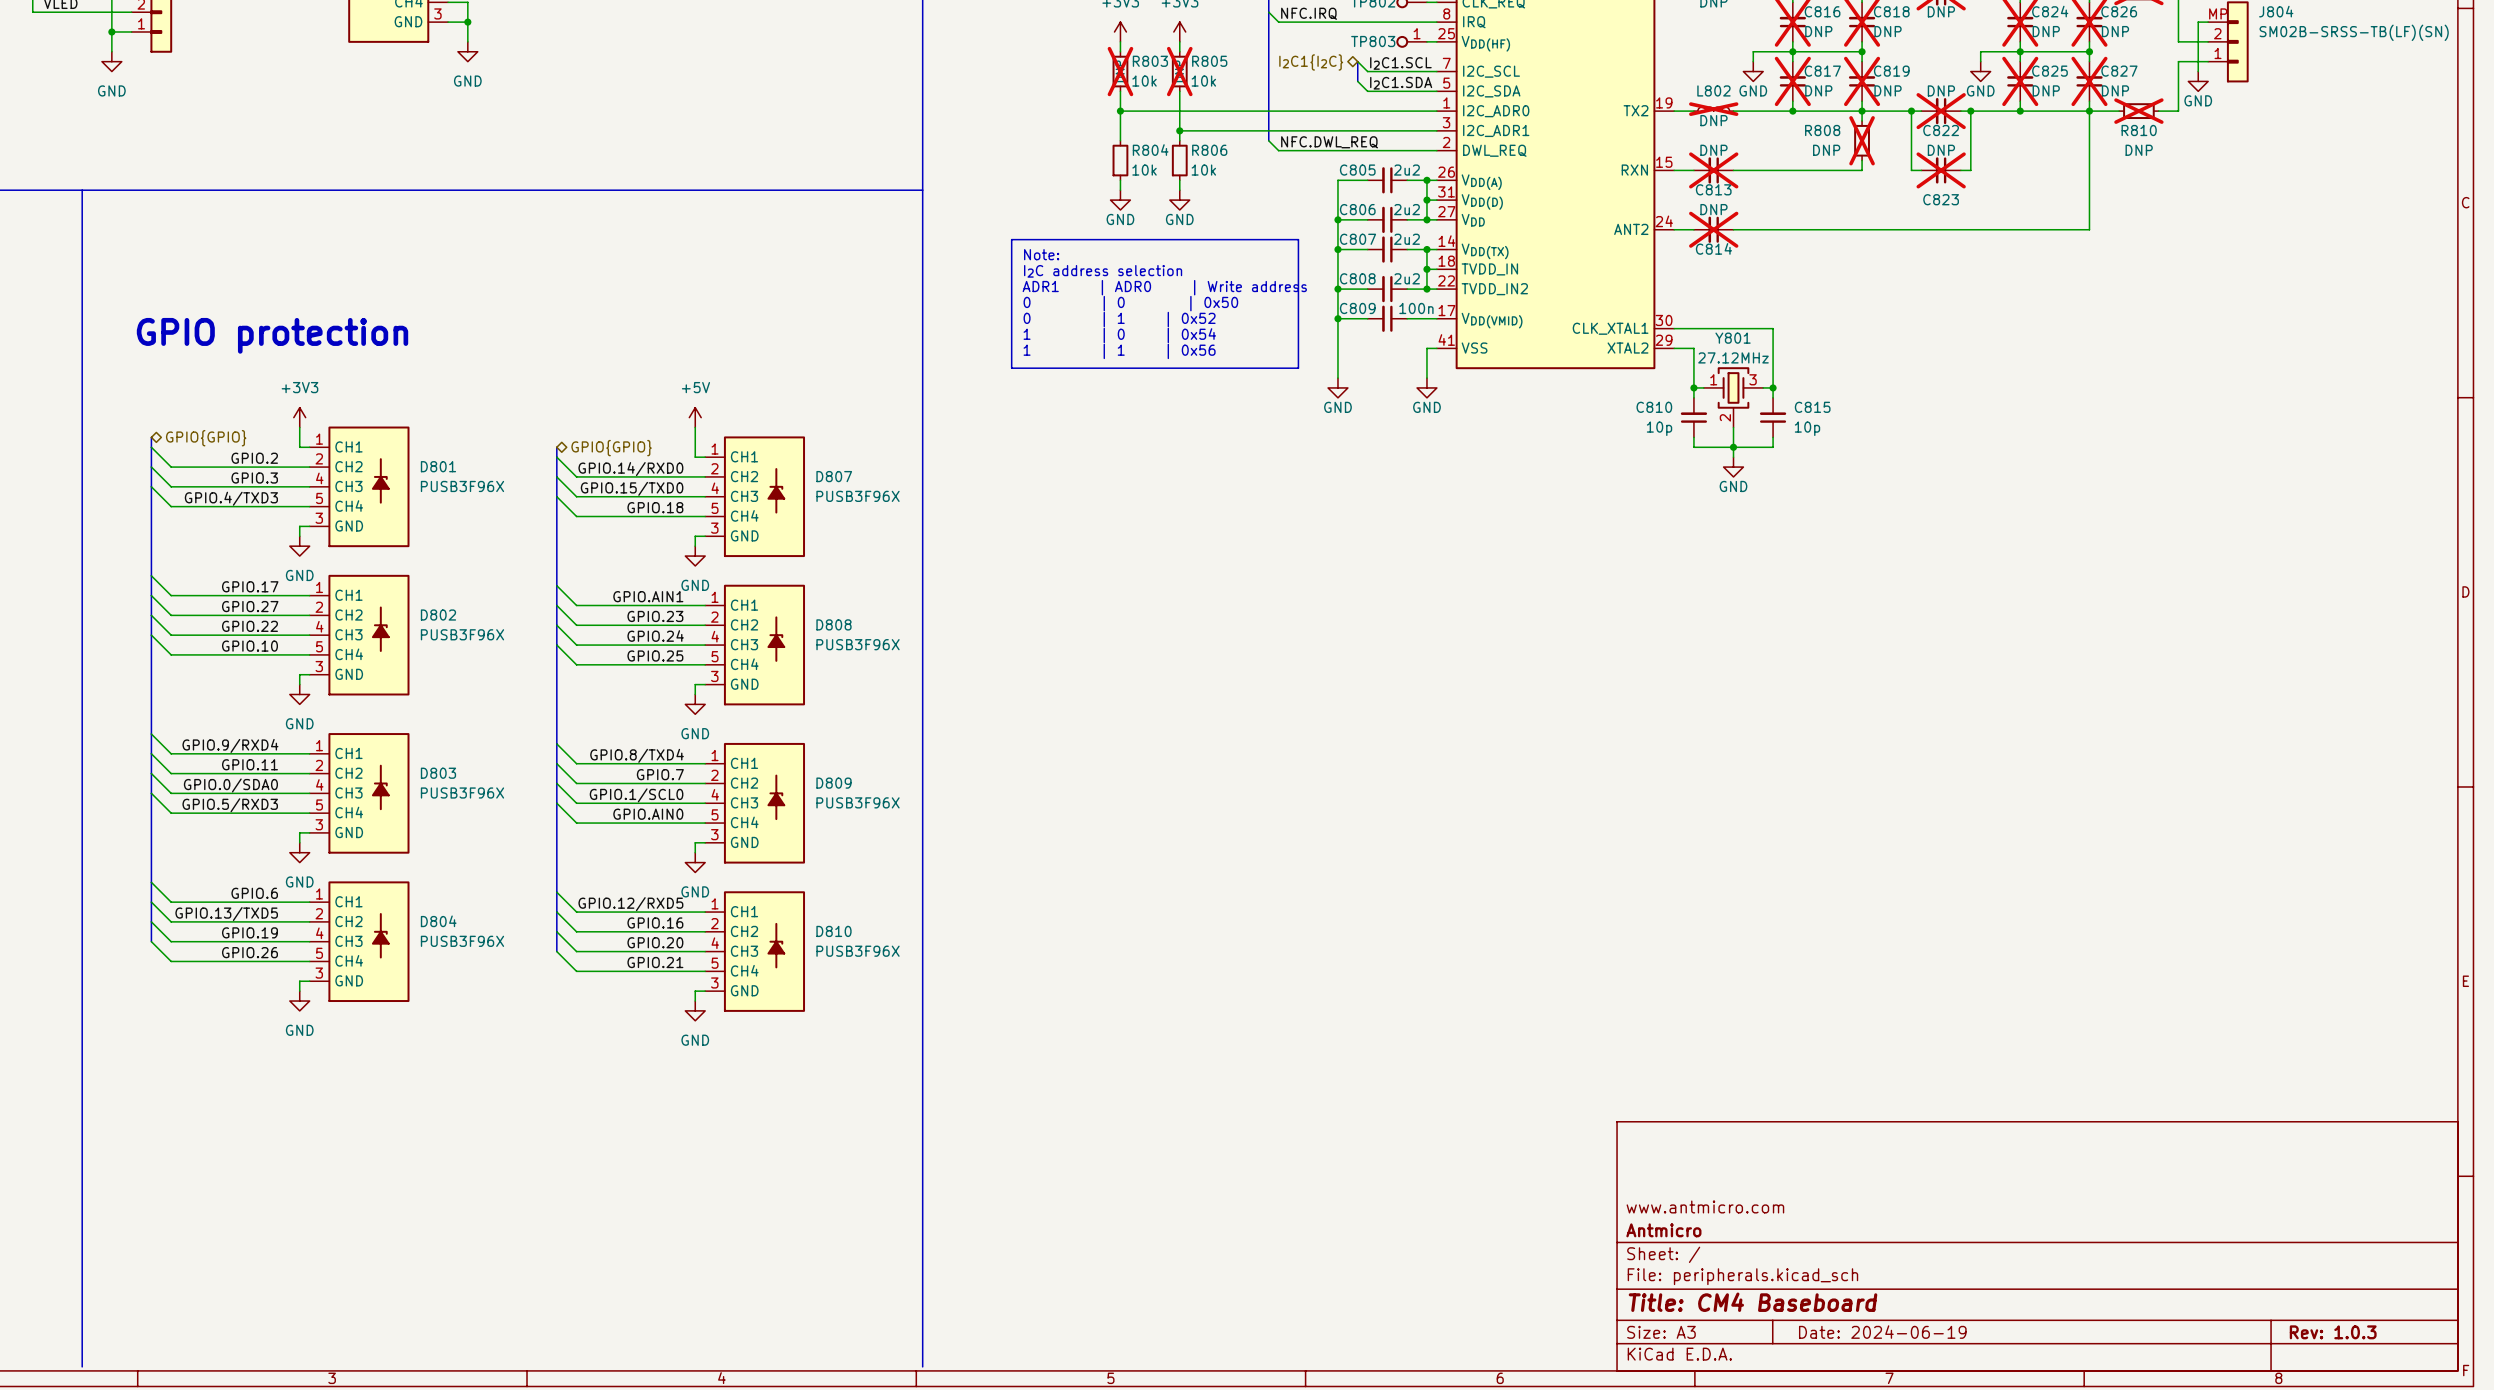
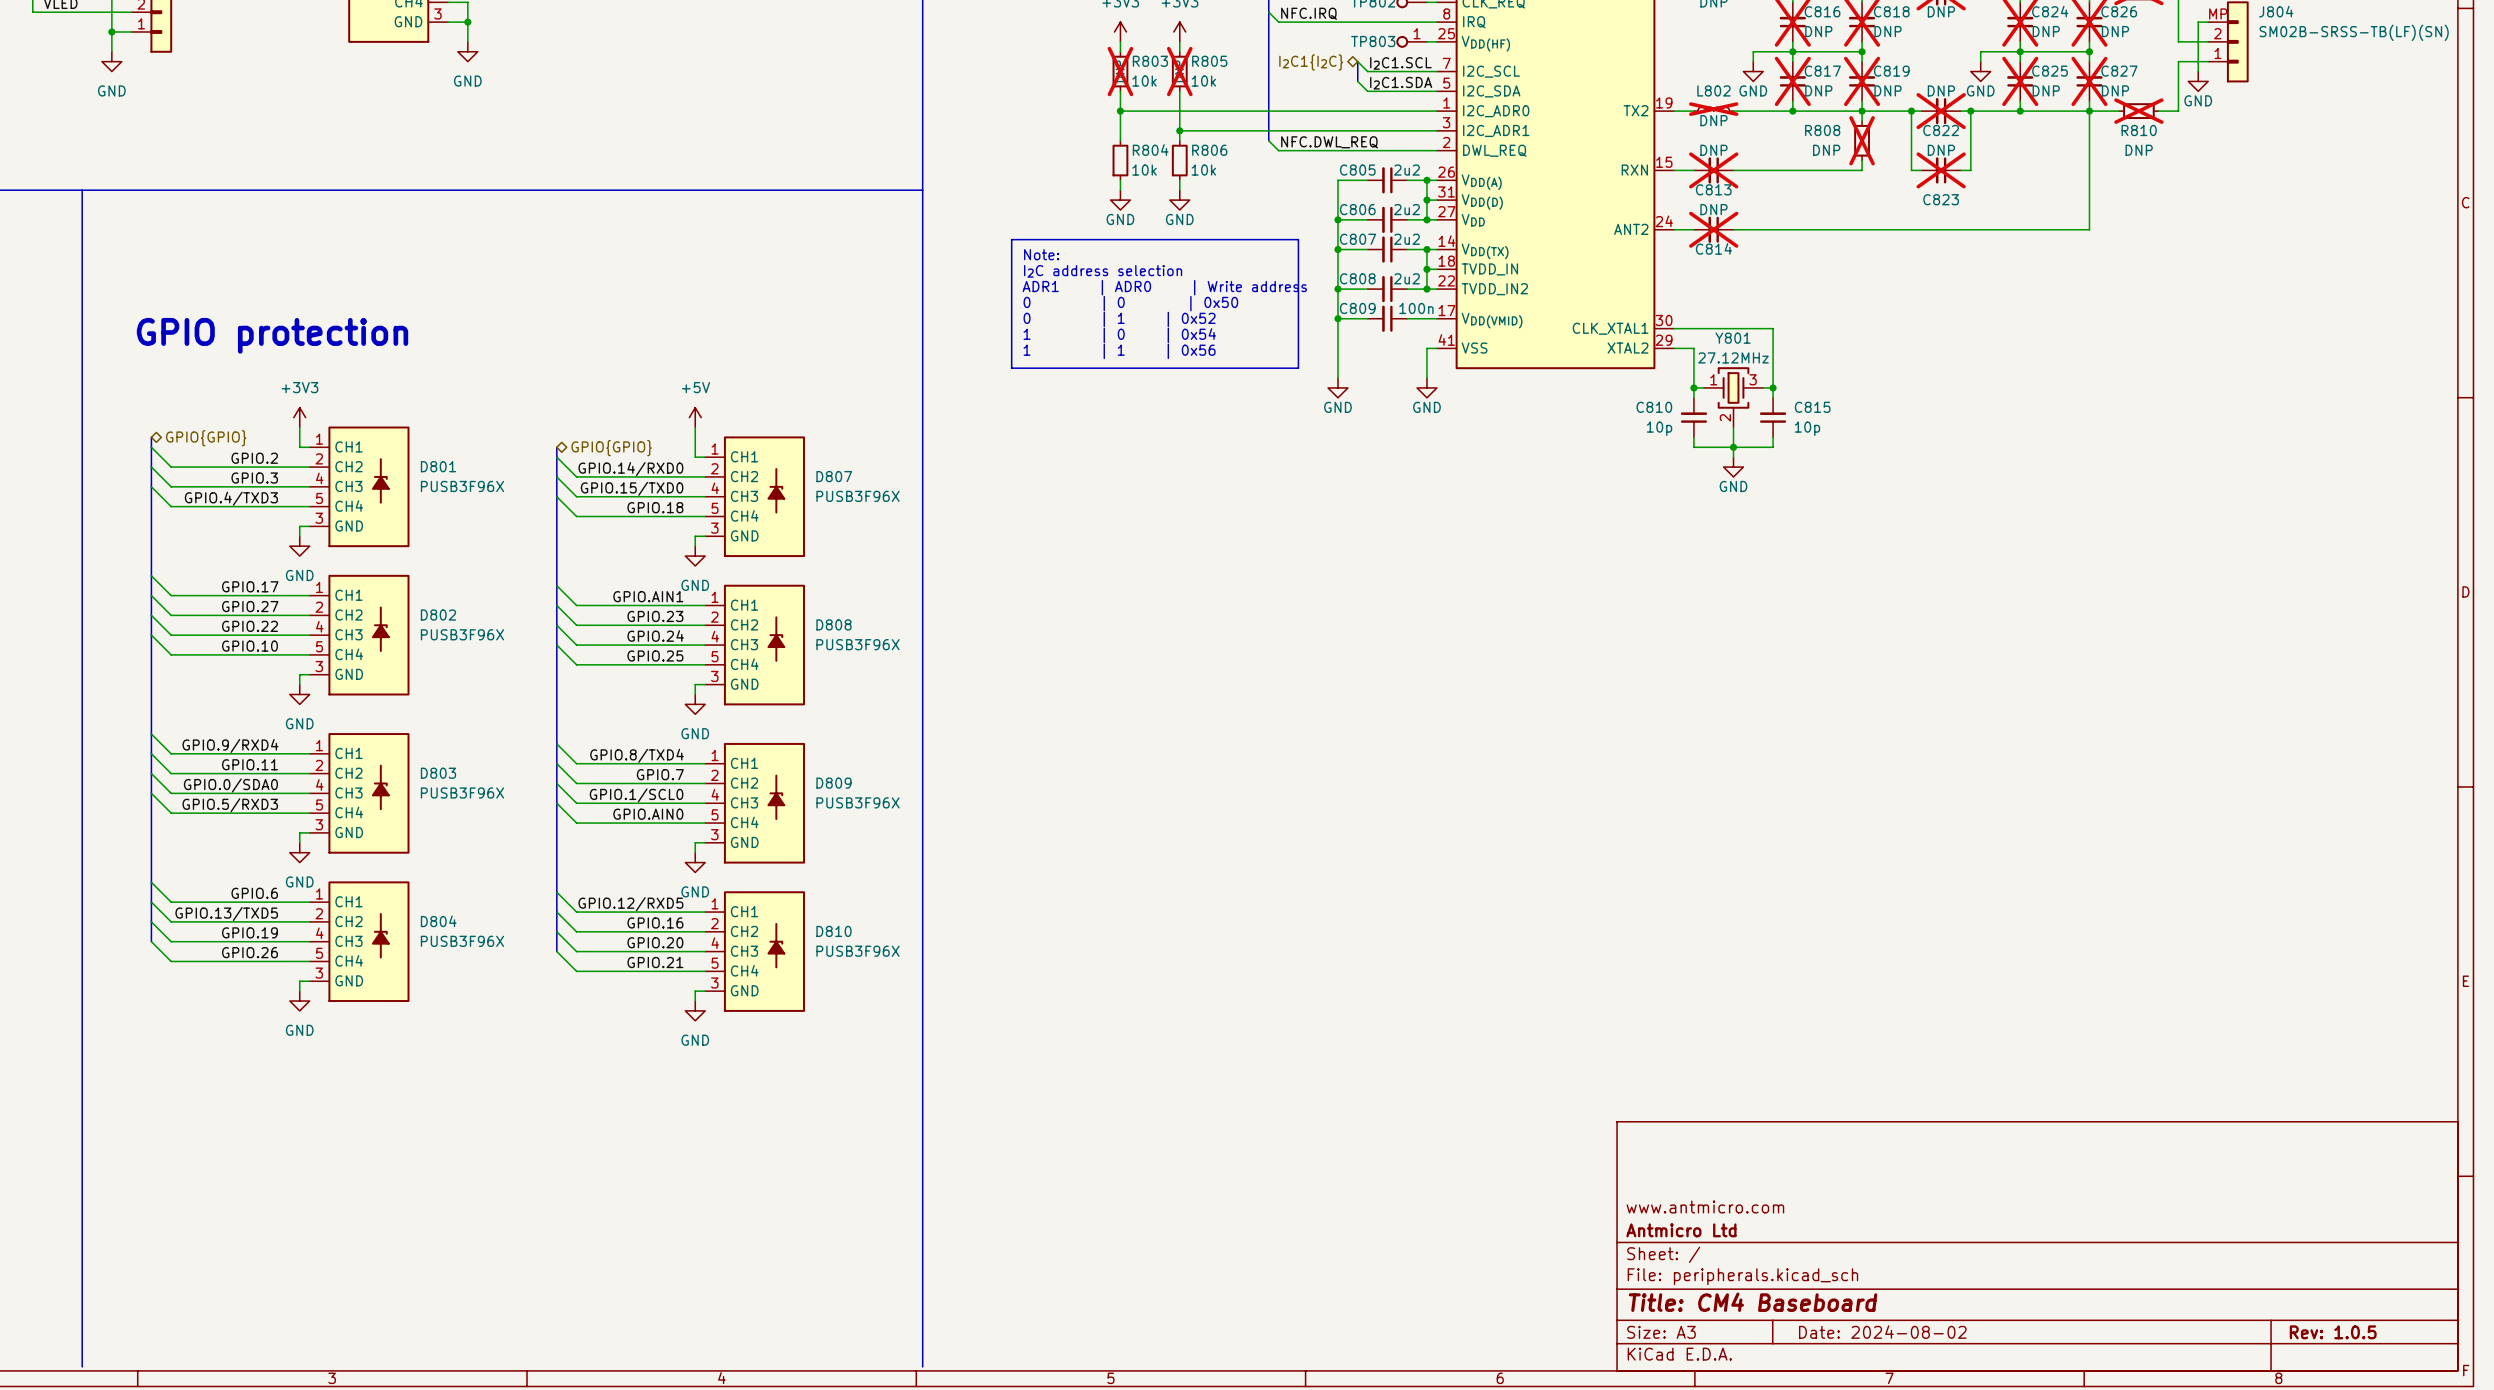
title block: Antmicro (1663, 1230) -> Antmicro Ltd (1681, 1230)
title block: Date: 2024-06-19 (1882, 1332) -> Date: 2024-08-02 (1882, 1332)
title block: Rev: 1.0.3 (2333, 1332) -> Rev: 1.0.5 (2333, 1332)

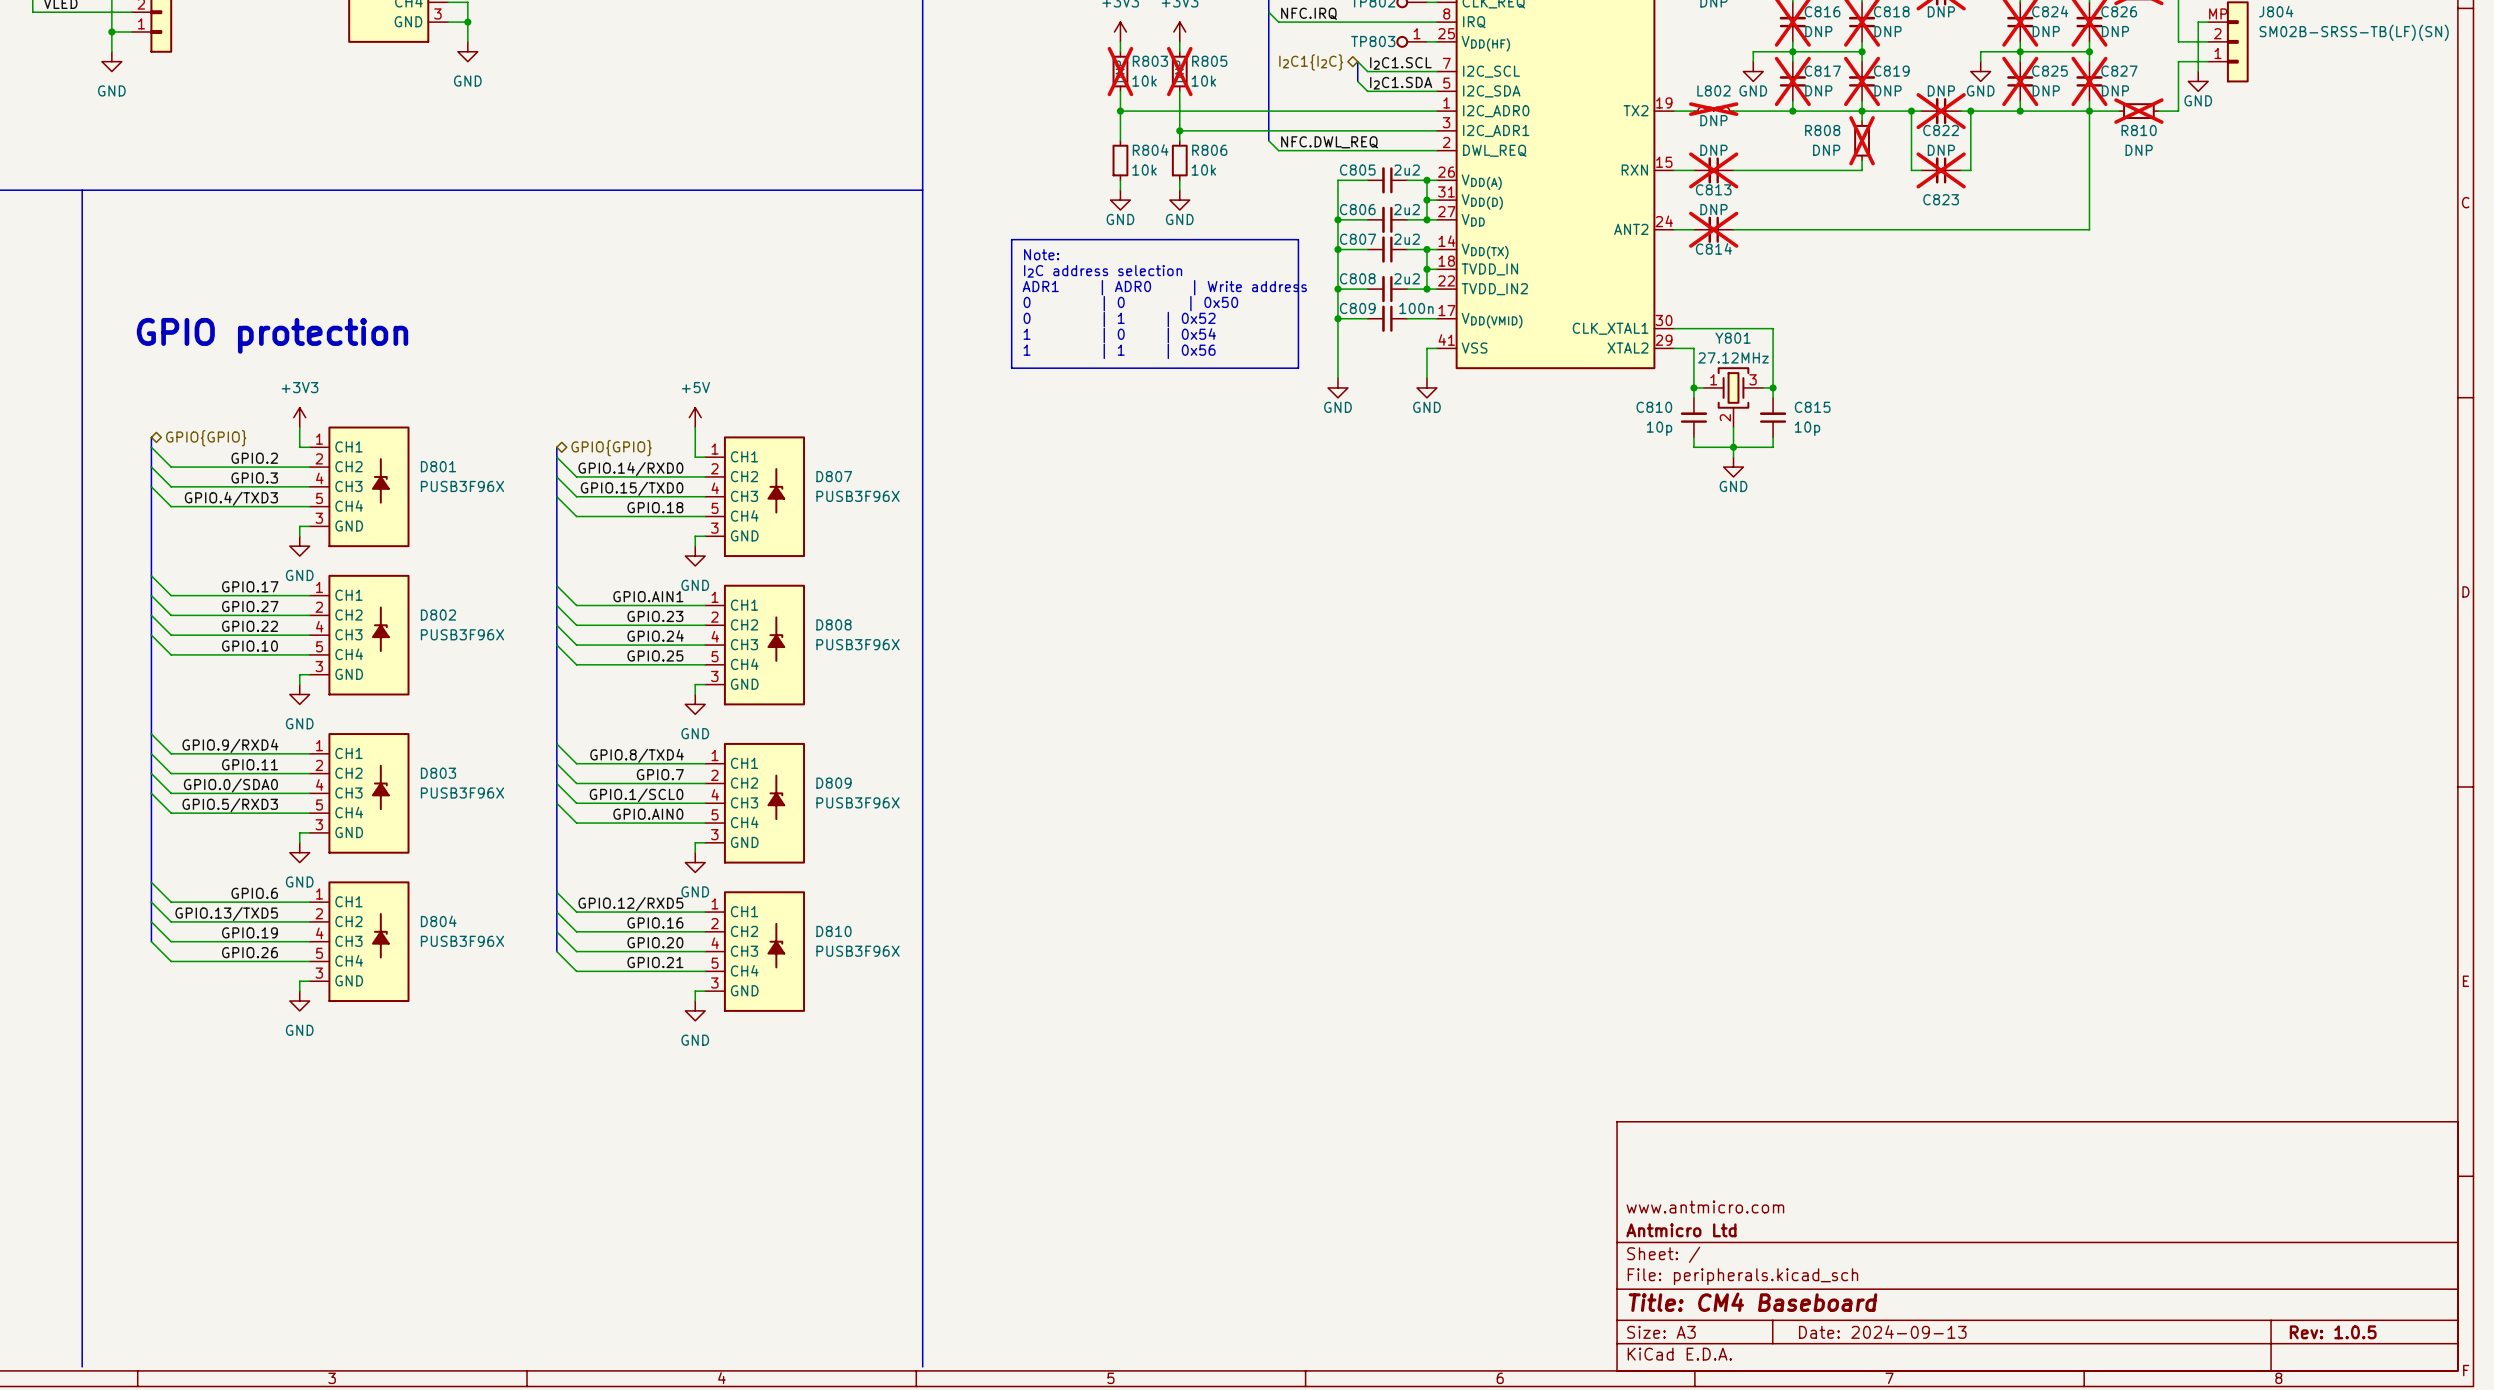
title block: Date: 2024-08-02 (1882, 1332) -> Date: 2024-09-13 (1882, 1332)

